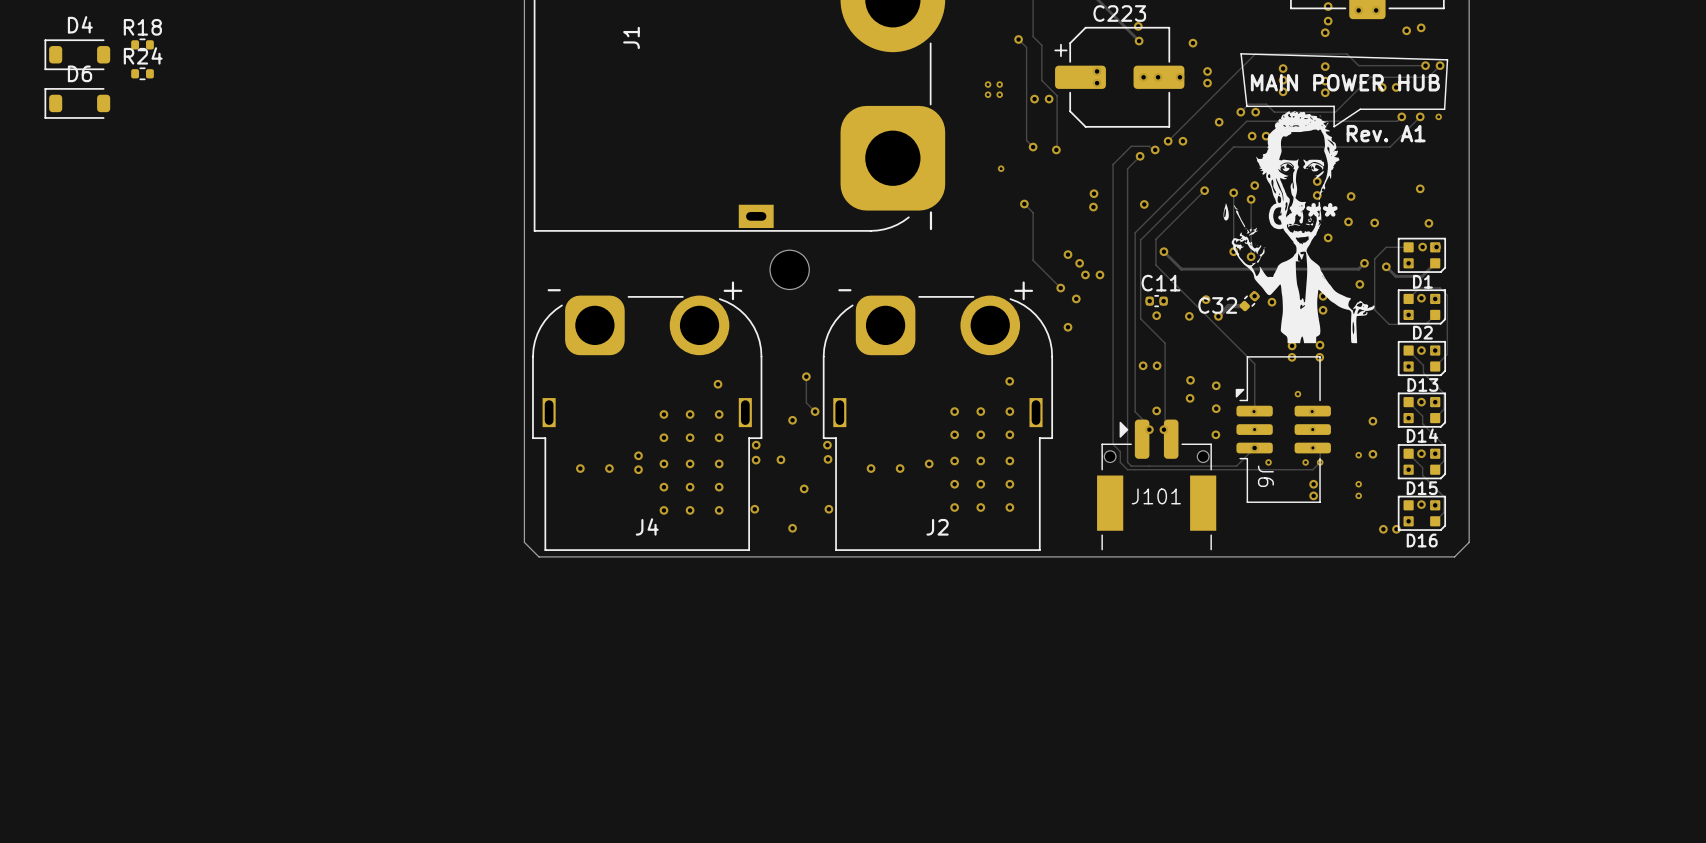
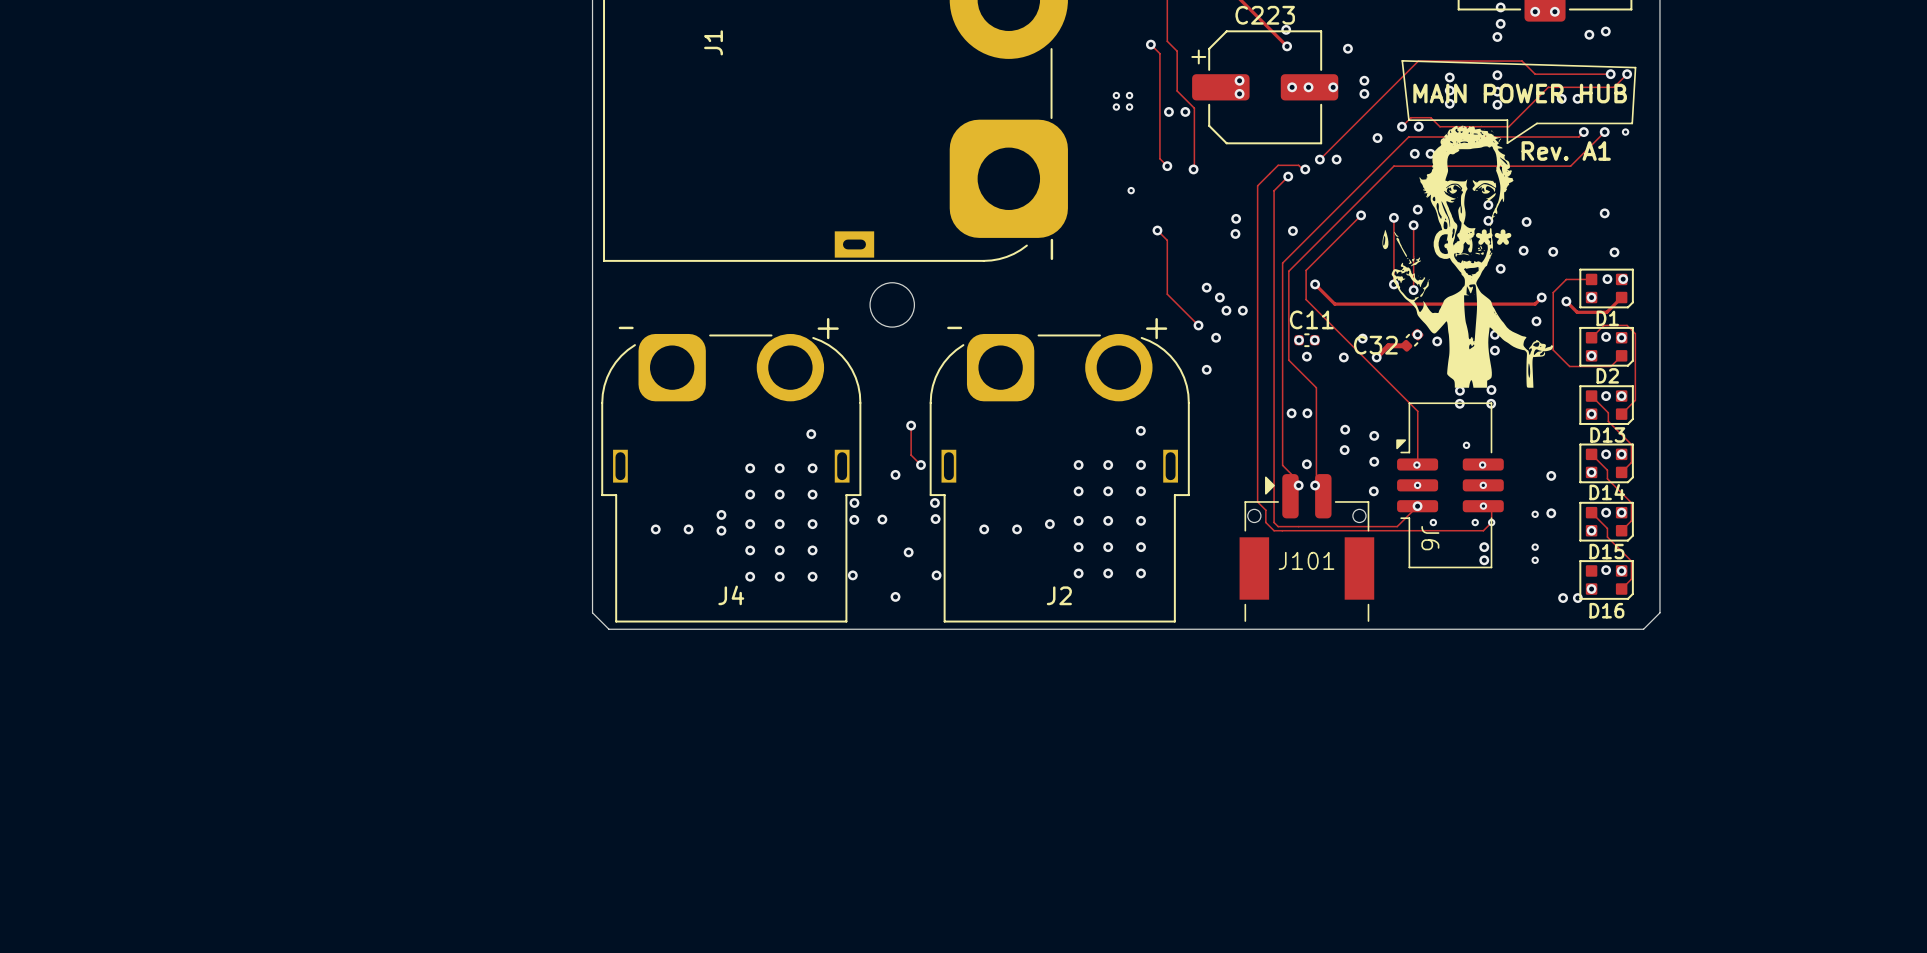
R18: (142, 44) -> none
D4: (77, 54) -> none
R24: (142, 73) -> none
D6: (77, 103) -> none

